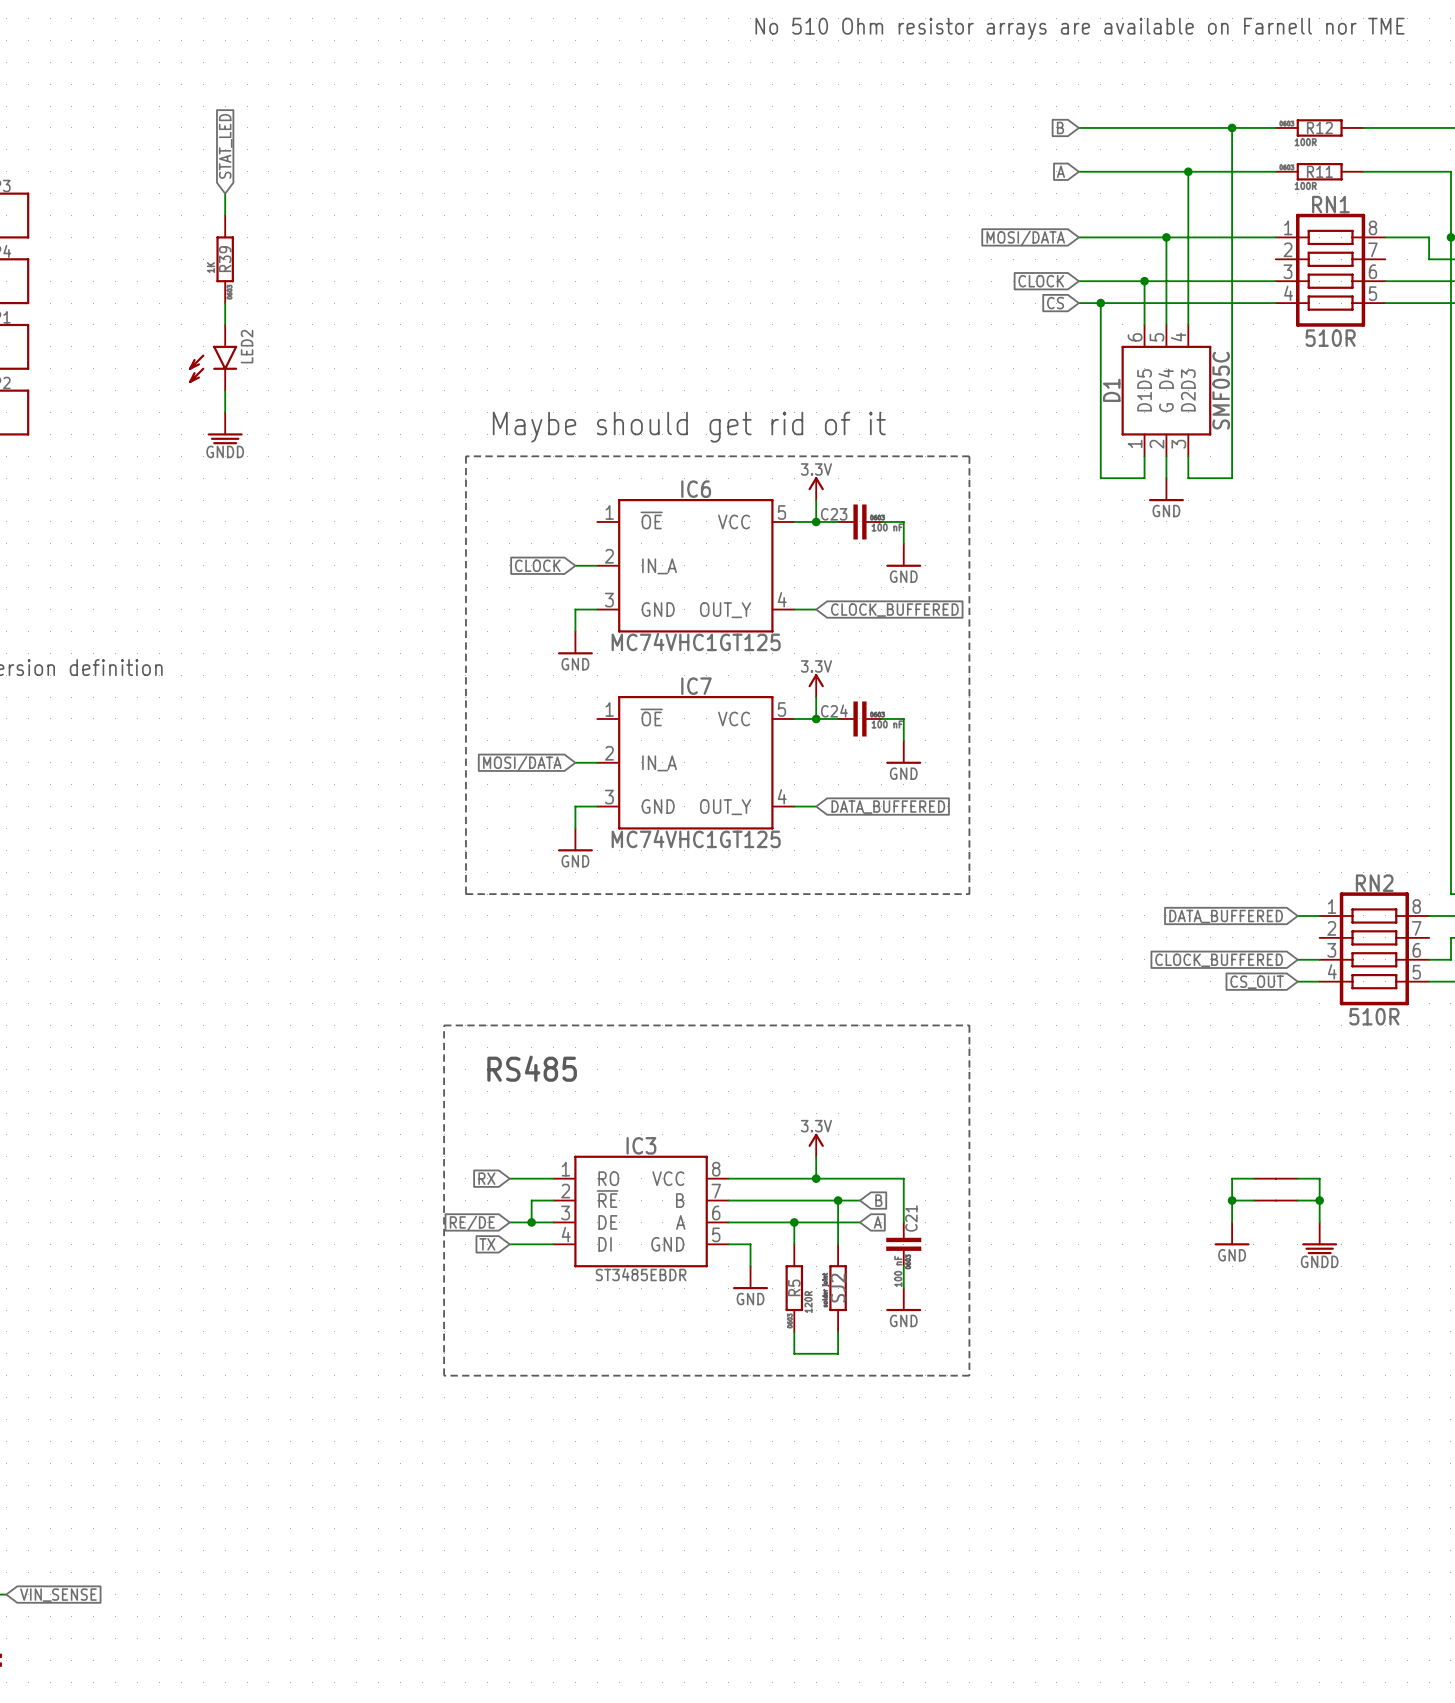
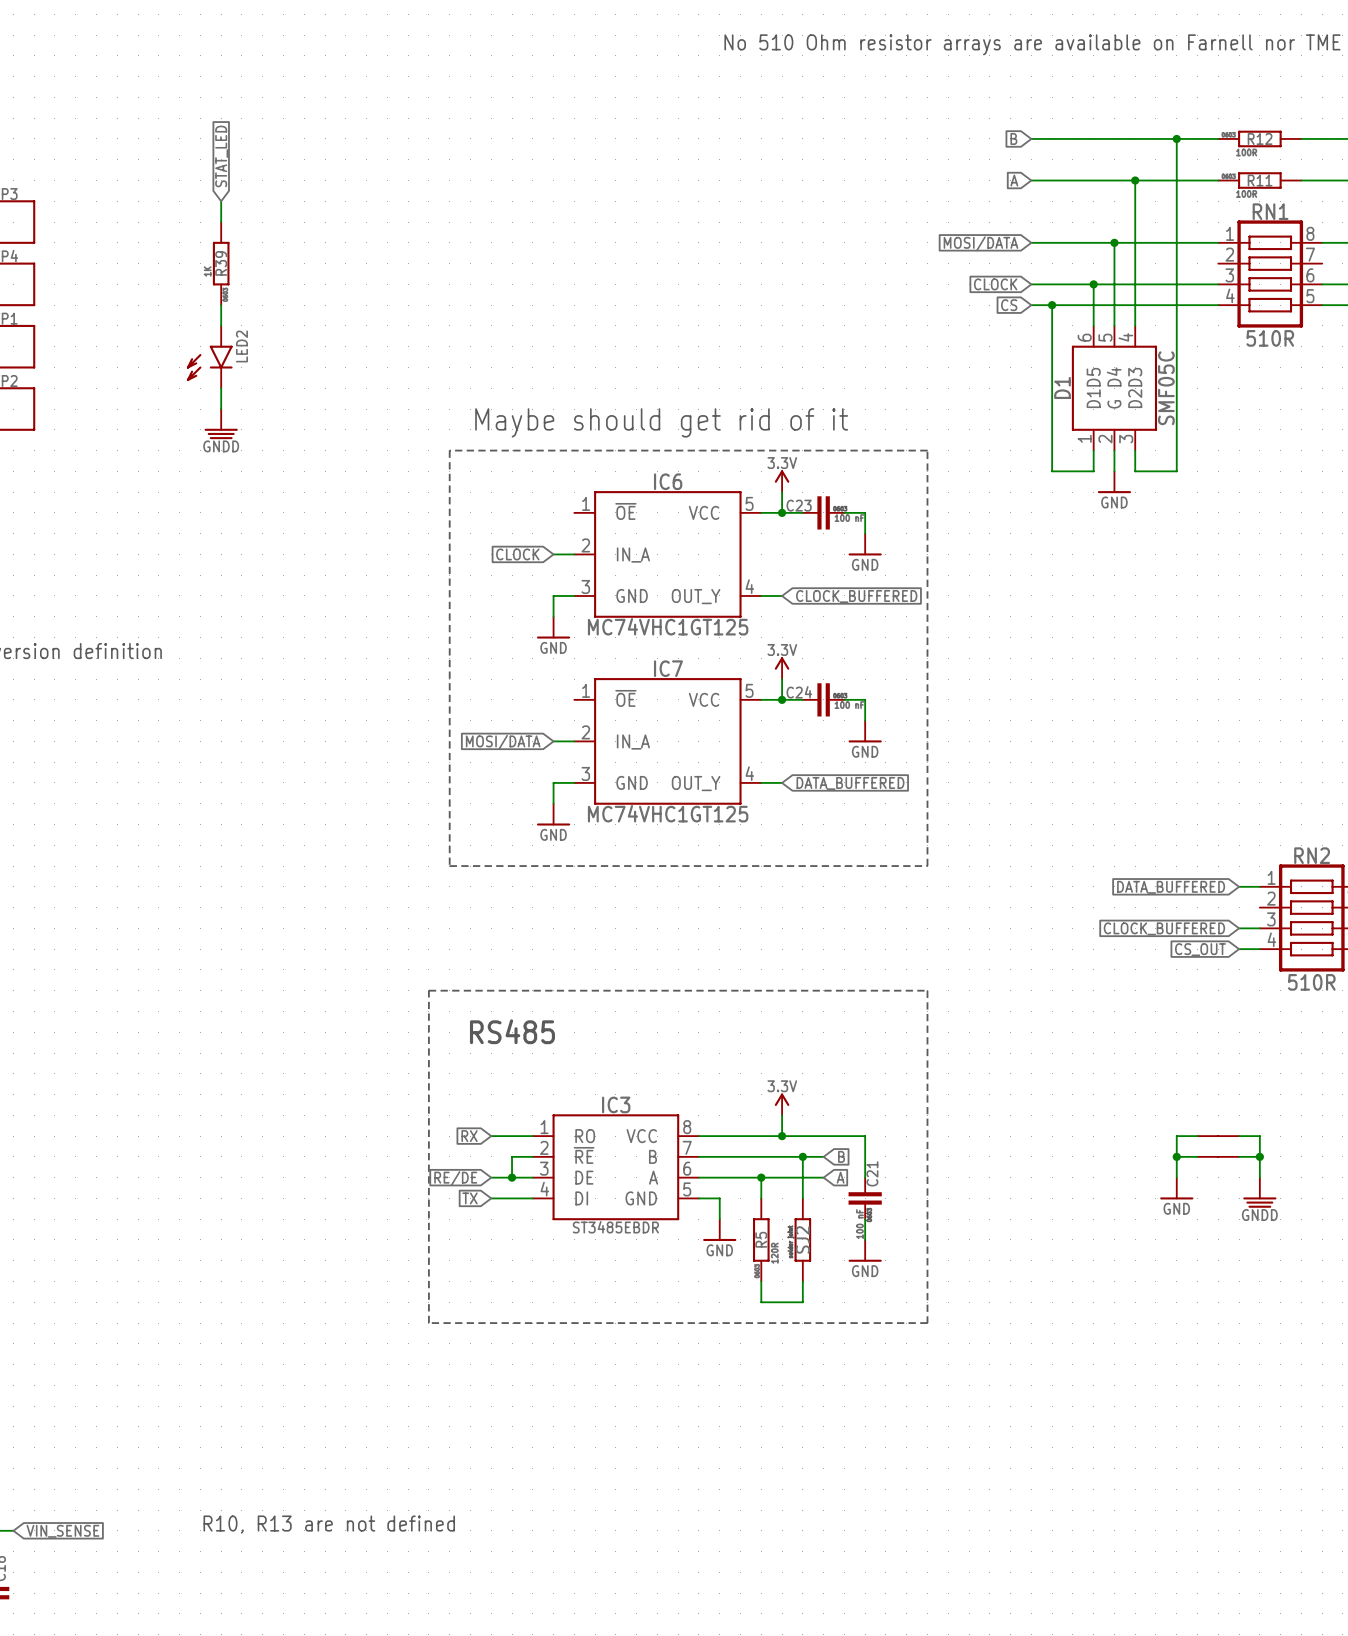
text: none -> R10, R13 are not defined (329, 1524)

